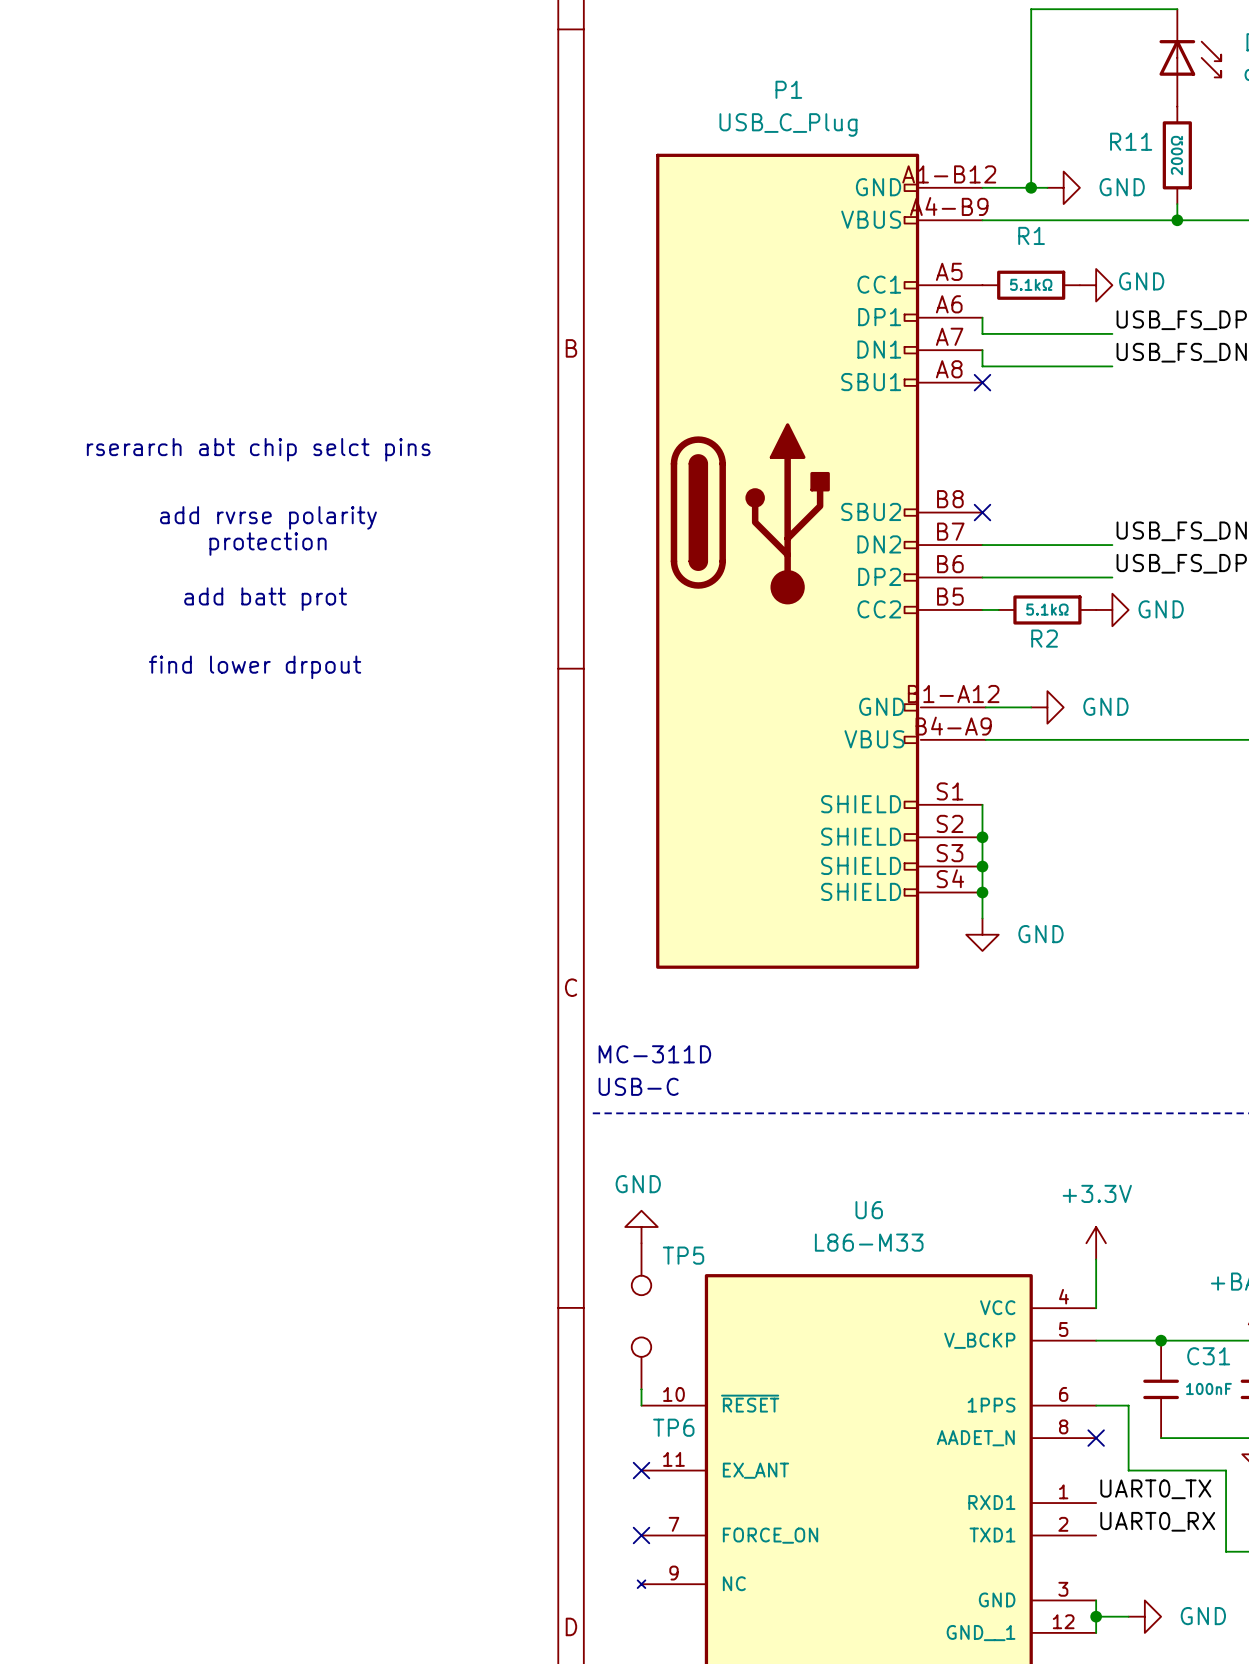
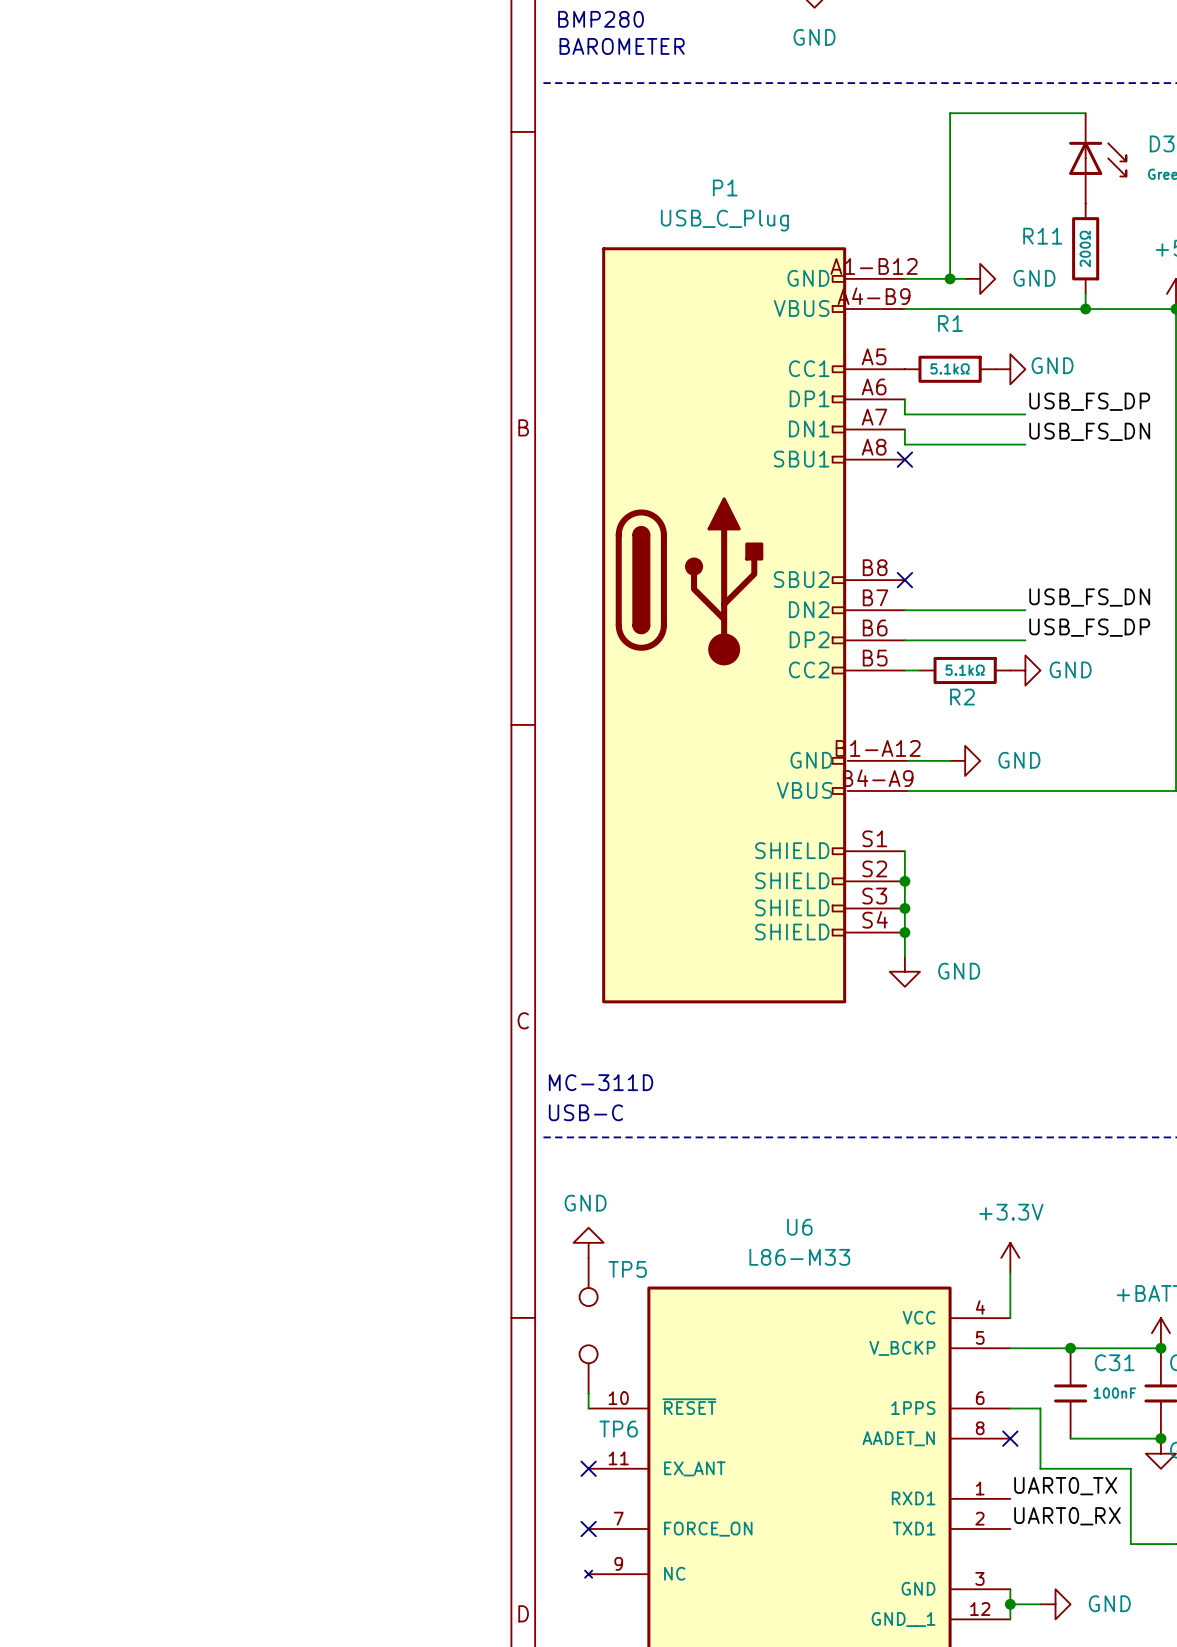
text: rserarch abt chip selct pins (258, 449) -> none
text: add rvrse polarity (268, 517) -> none
text: protection (268, 544) -> none
text: add batt prot (265, 599) -> none
text: find lower drpout (255, 667) -> none

